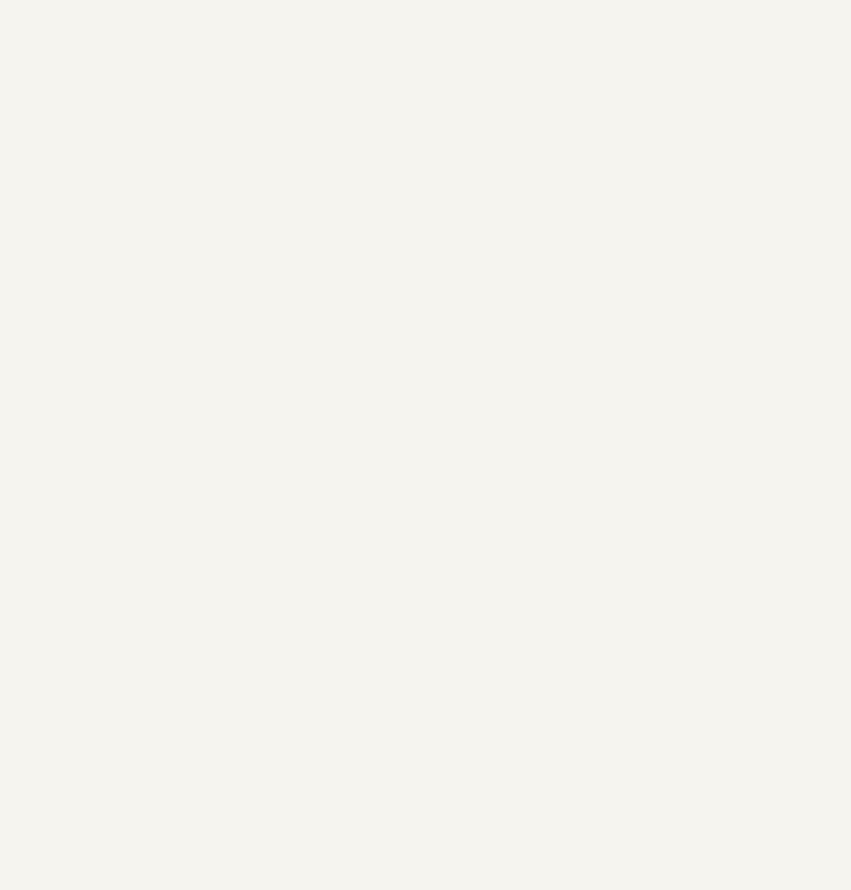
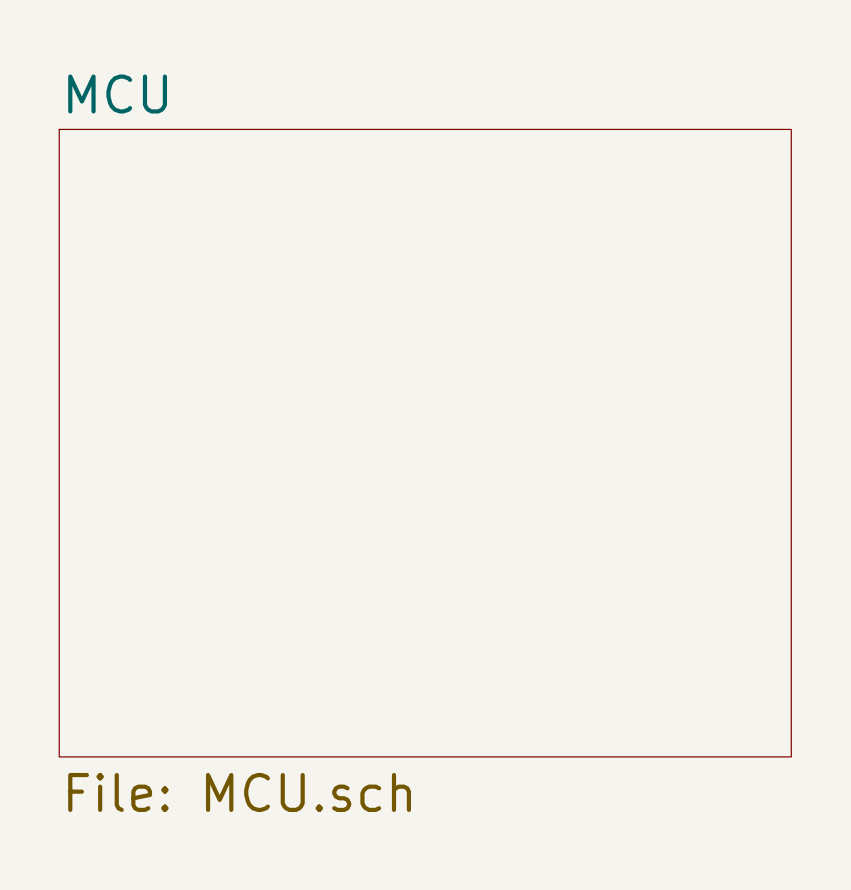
sheet MCU: none -> File: MCU.sch (425, 443)

